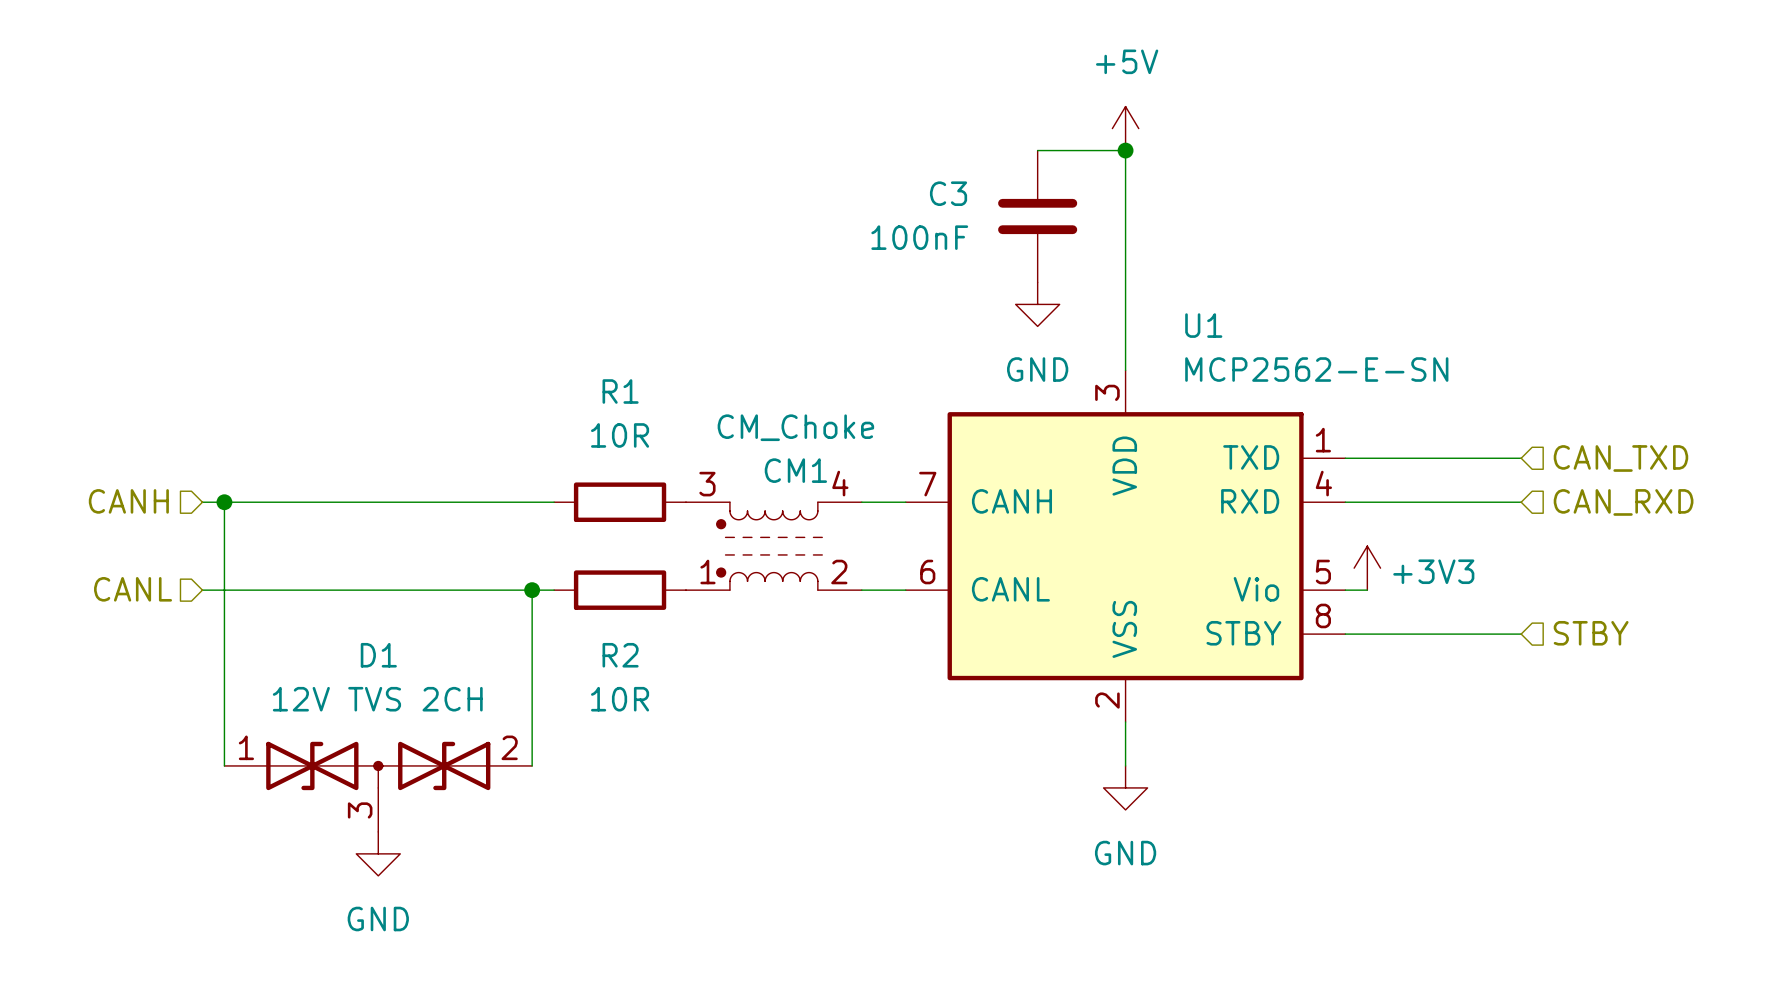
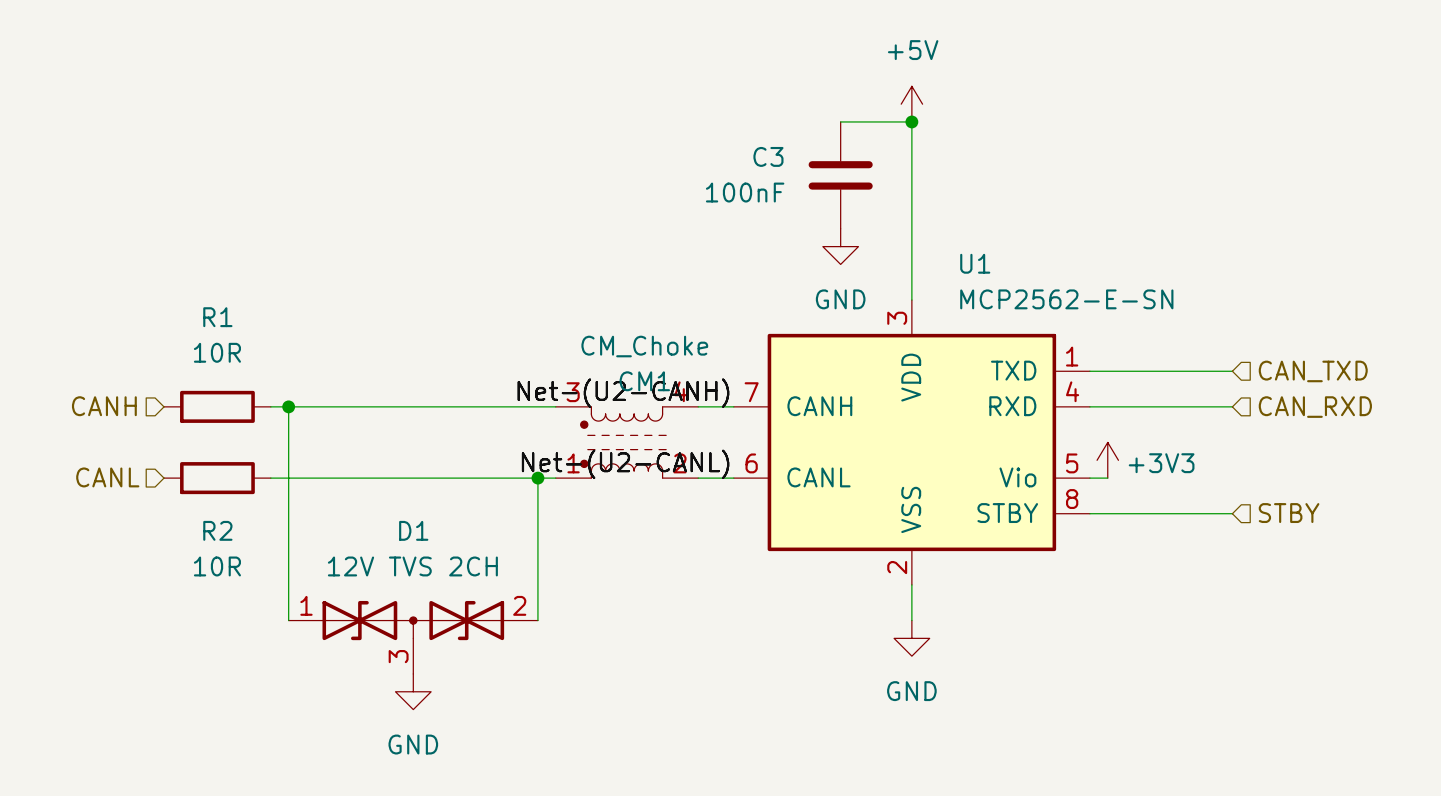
label: none -> Net-(U2-CANH) (623, 393)
wire: (202, 502) (334, 502) -> (448, 406) (555, 406)
wire: (224, 502) (224, 765) -> (288, 406) (288, 620)
junction: (224, 502) -> none
junction: none -> (288, 406)
R1 position: (620, 502) -> (217, 406)
label: none -> Net-(U2-CANL) (625, 464)
wire: (202, 590) (334, 590) -> (448, 478) (555, 478)
wire: (532, 590) (532, 765) -> (537, 478) (537, 620)
junction: (532, 590) -> none
R2 position: (620, 590) -> (217, 478)
junction: none -> (537, 478)
D1 position: (378, 786) -> (413, 637)
power symbol position: GND (378, 853) -> GND (413, 691)

